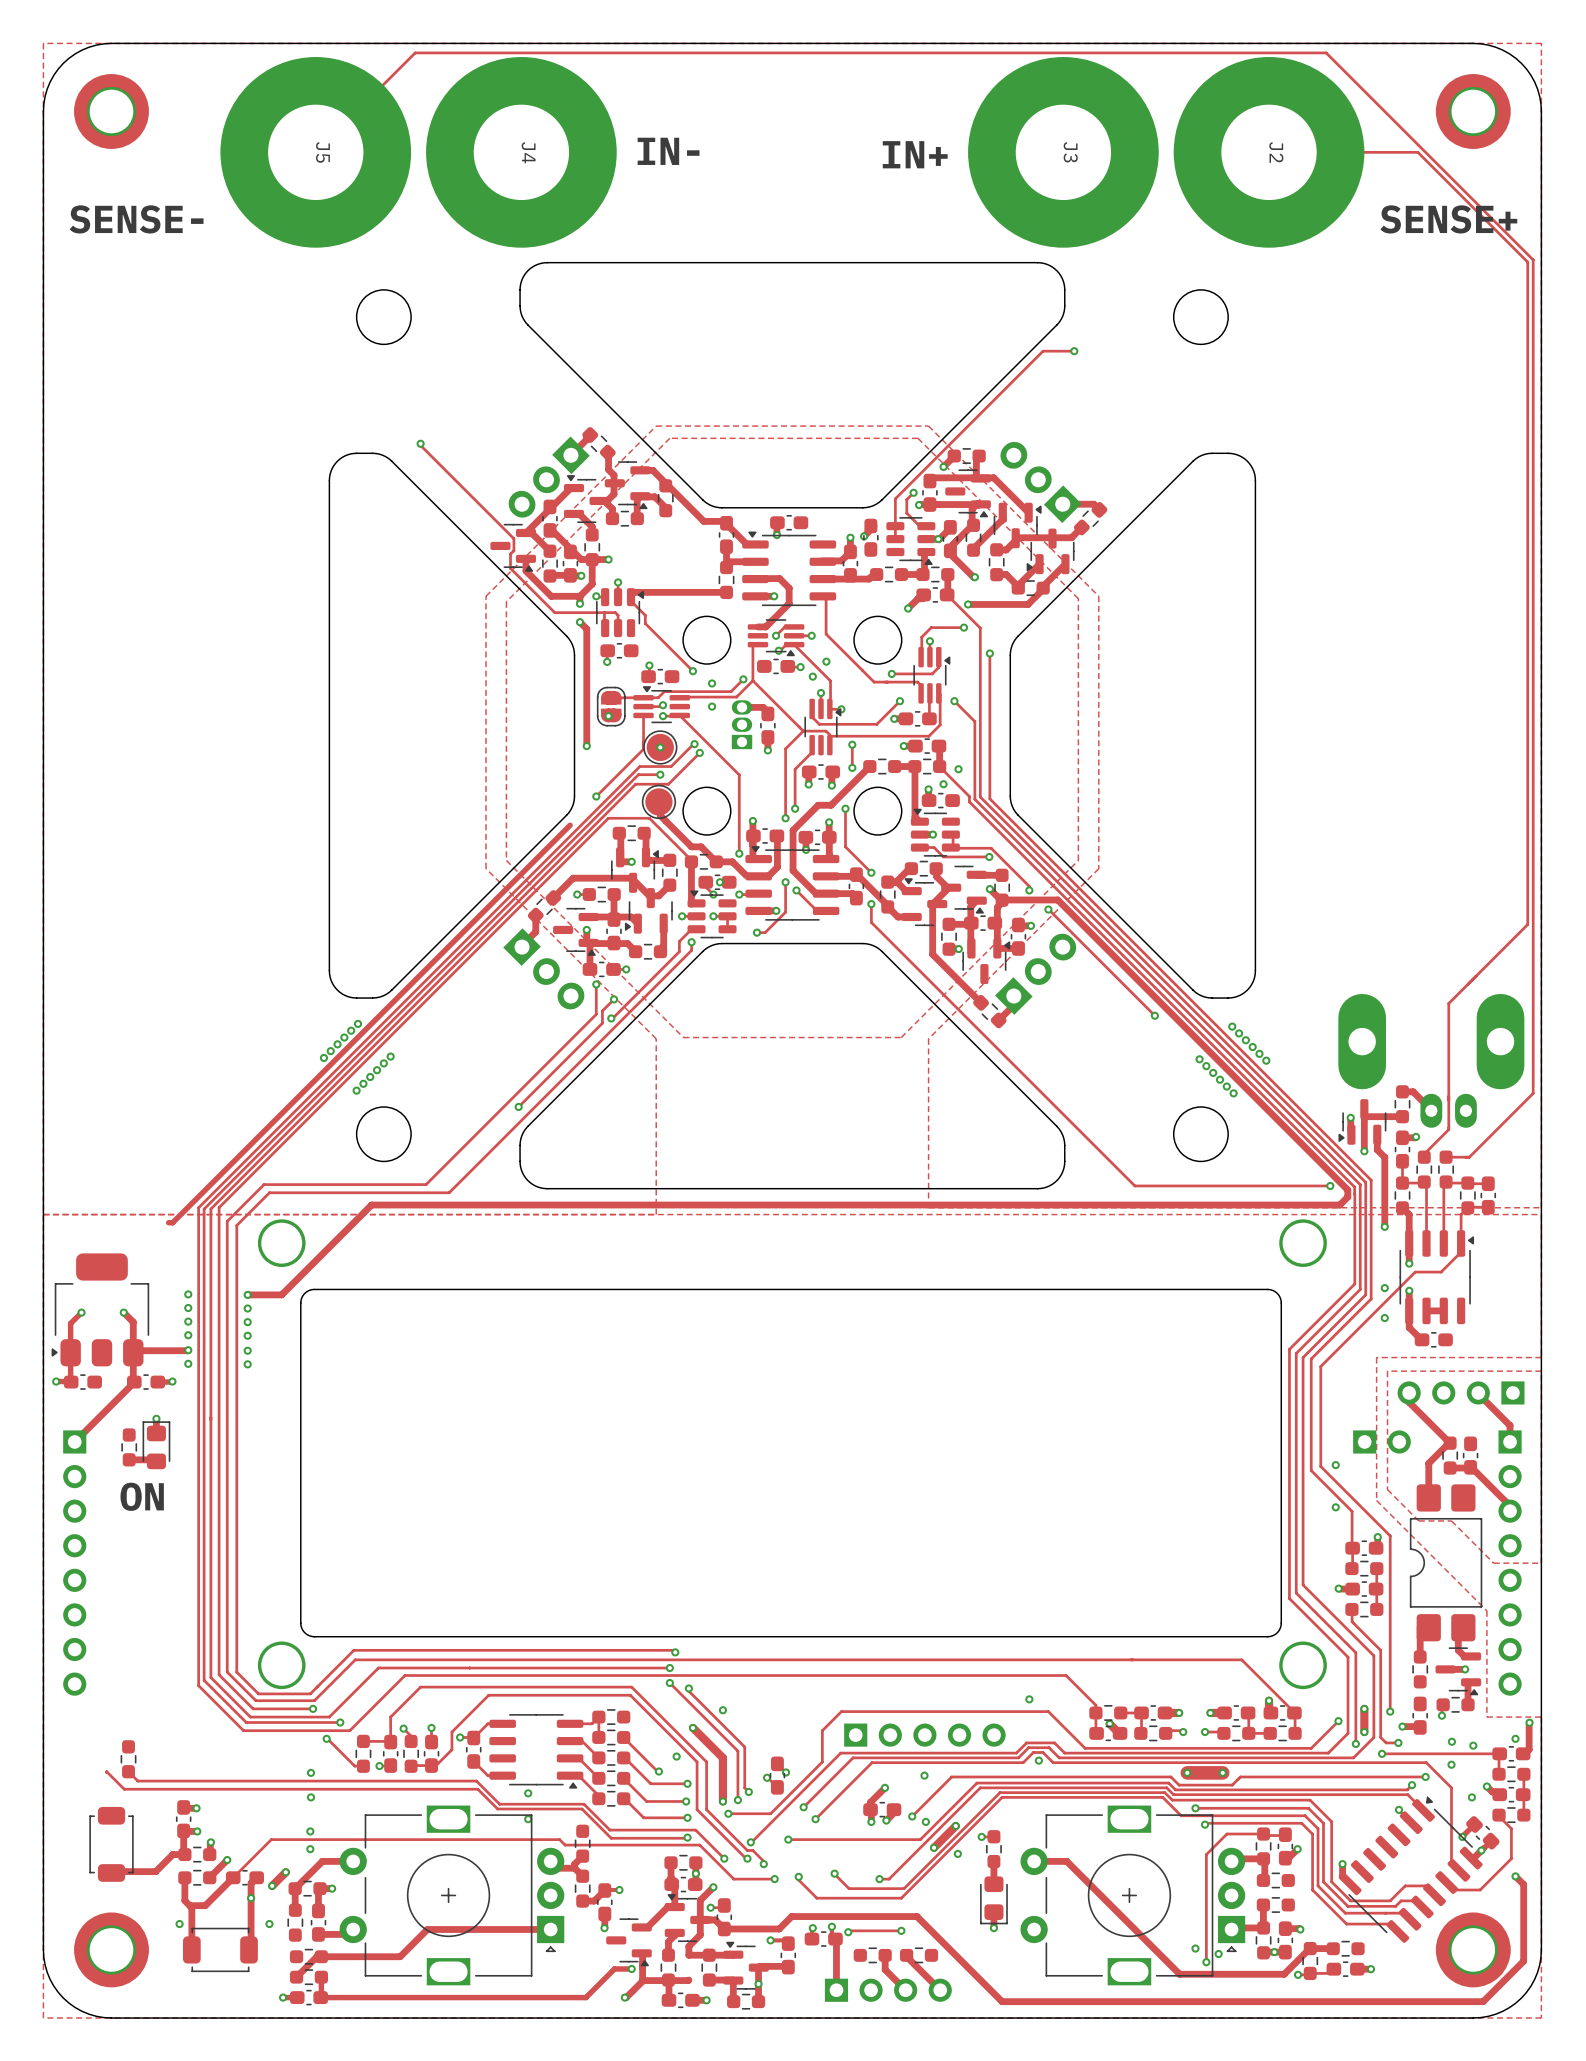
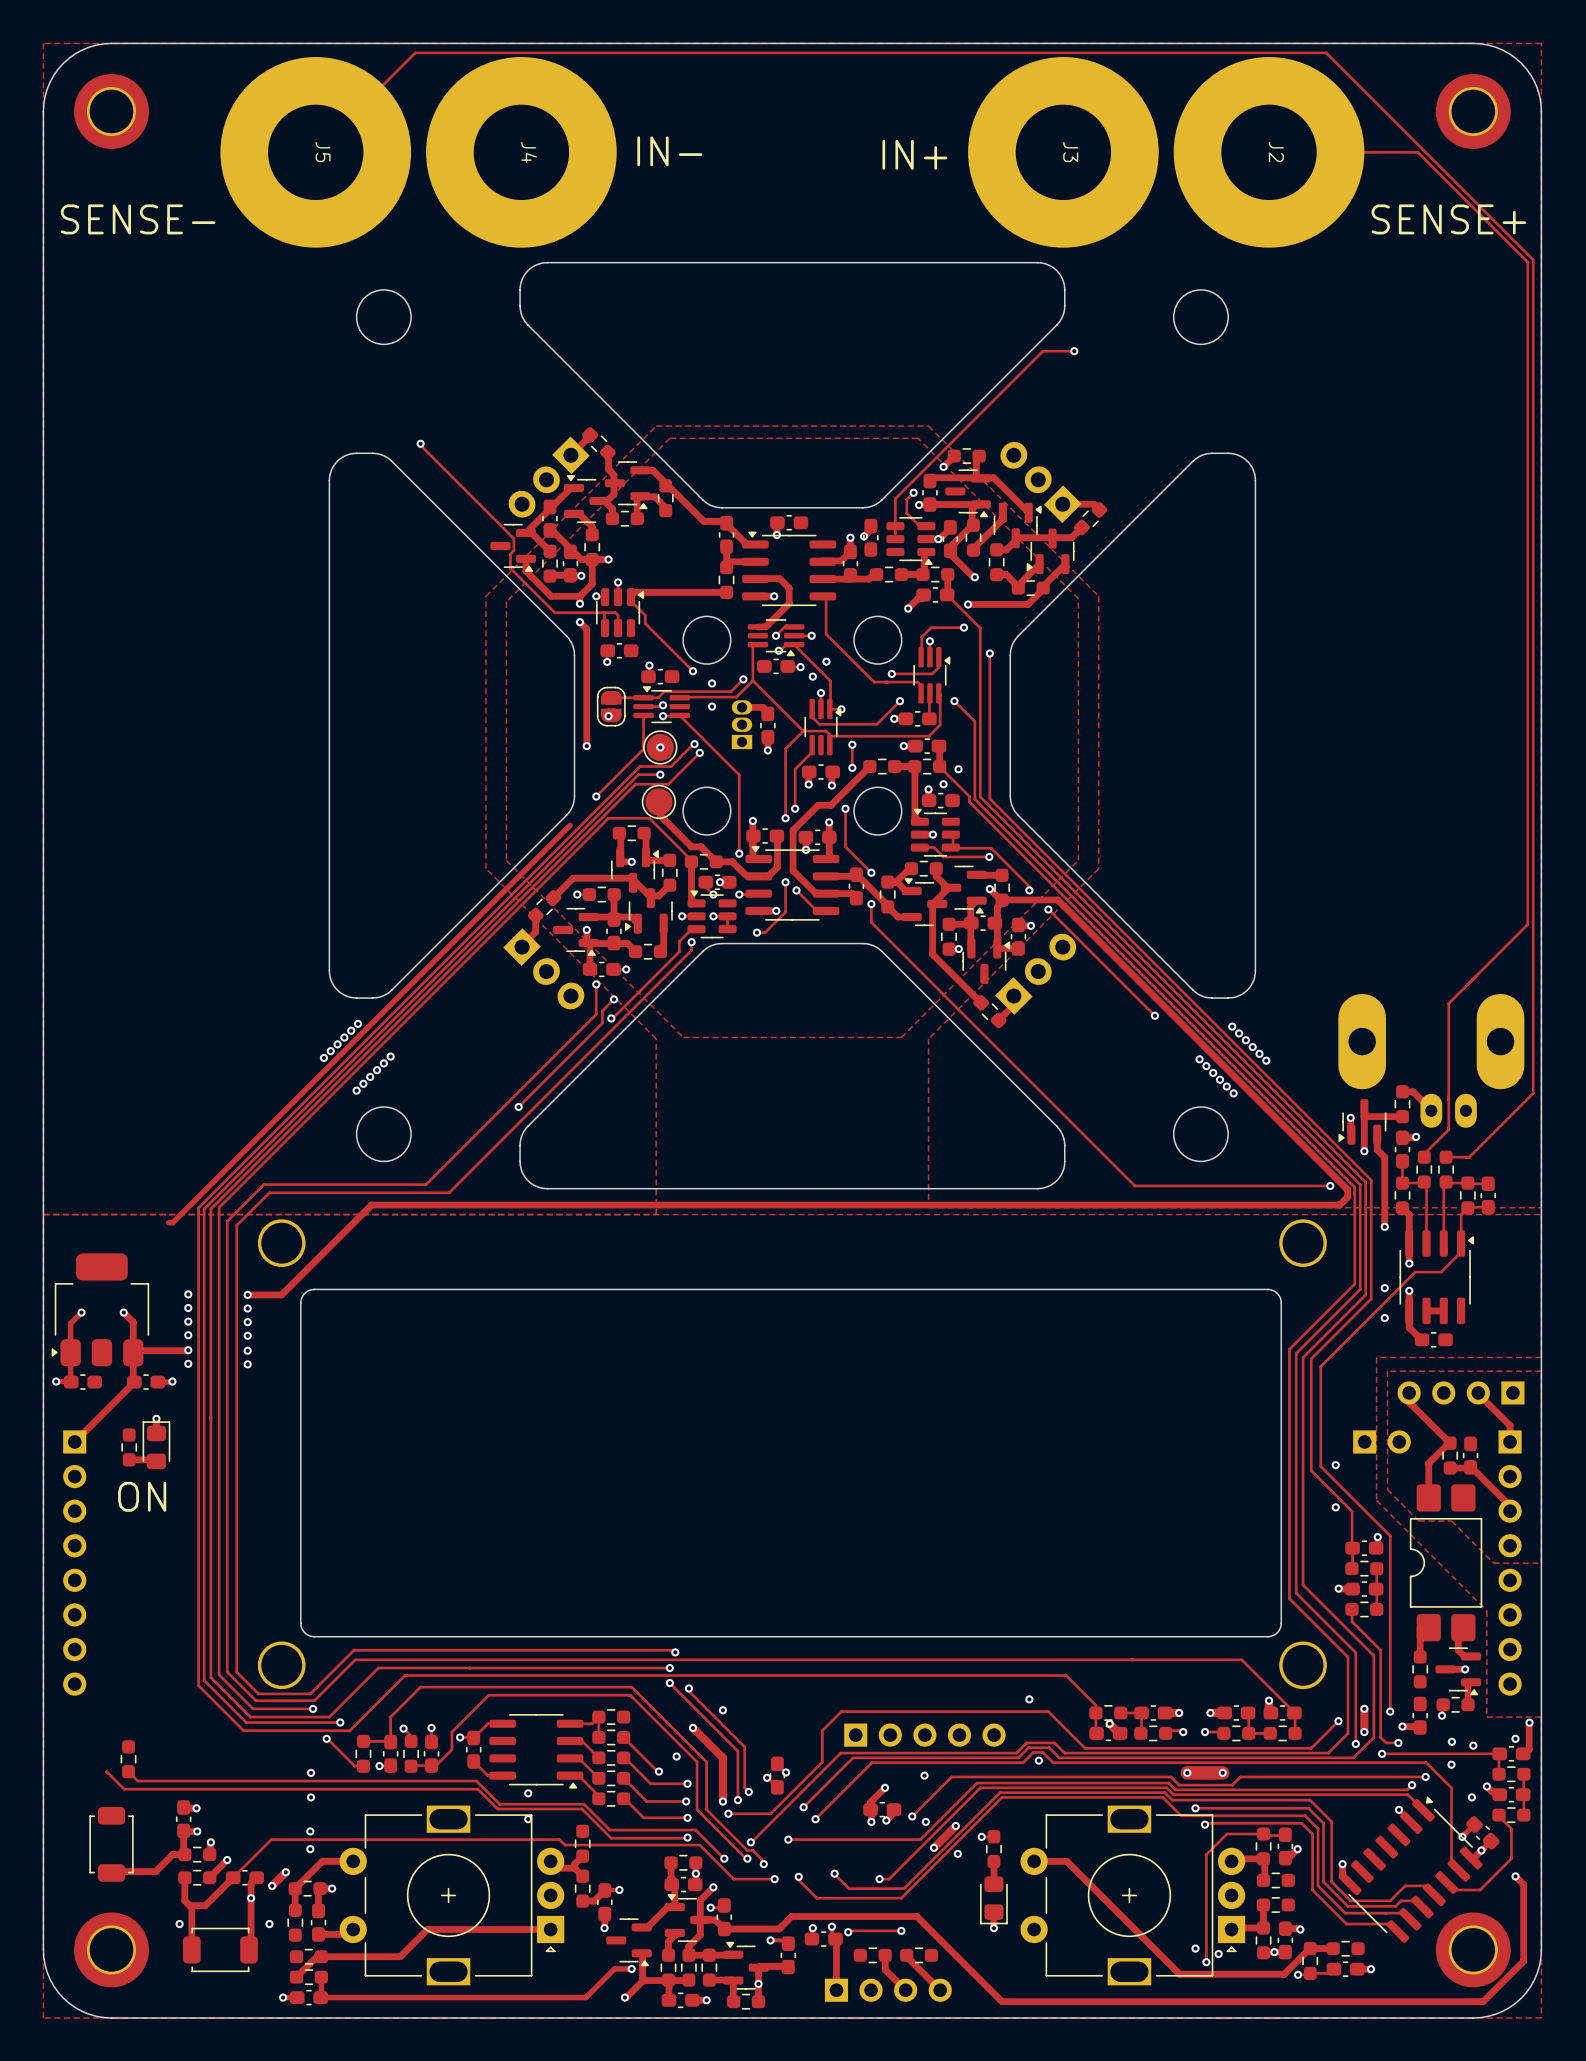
part: none -> (688, 1967)

